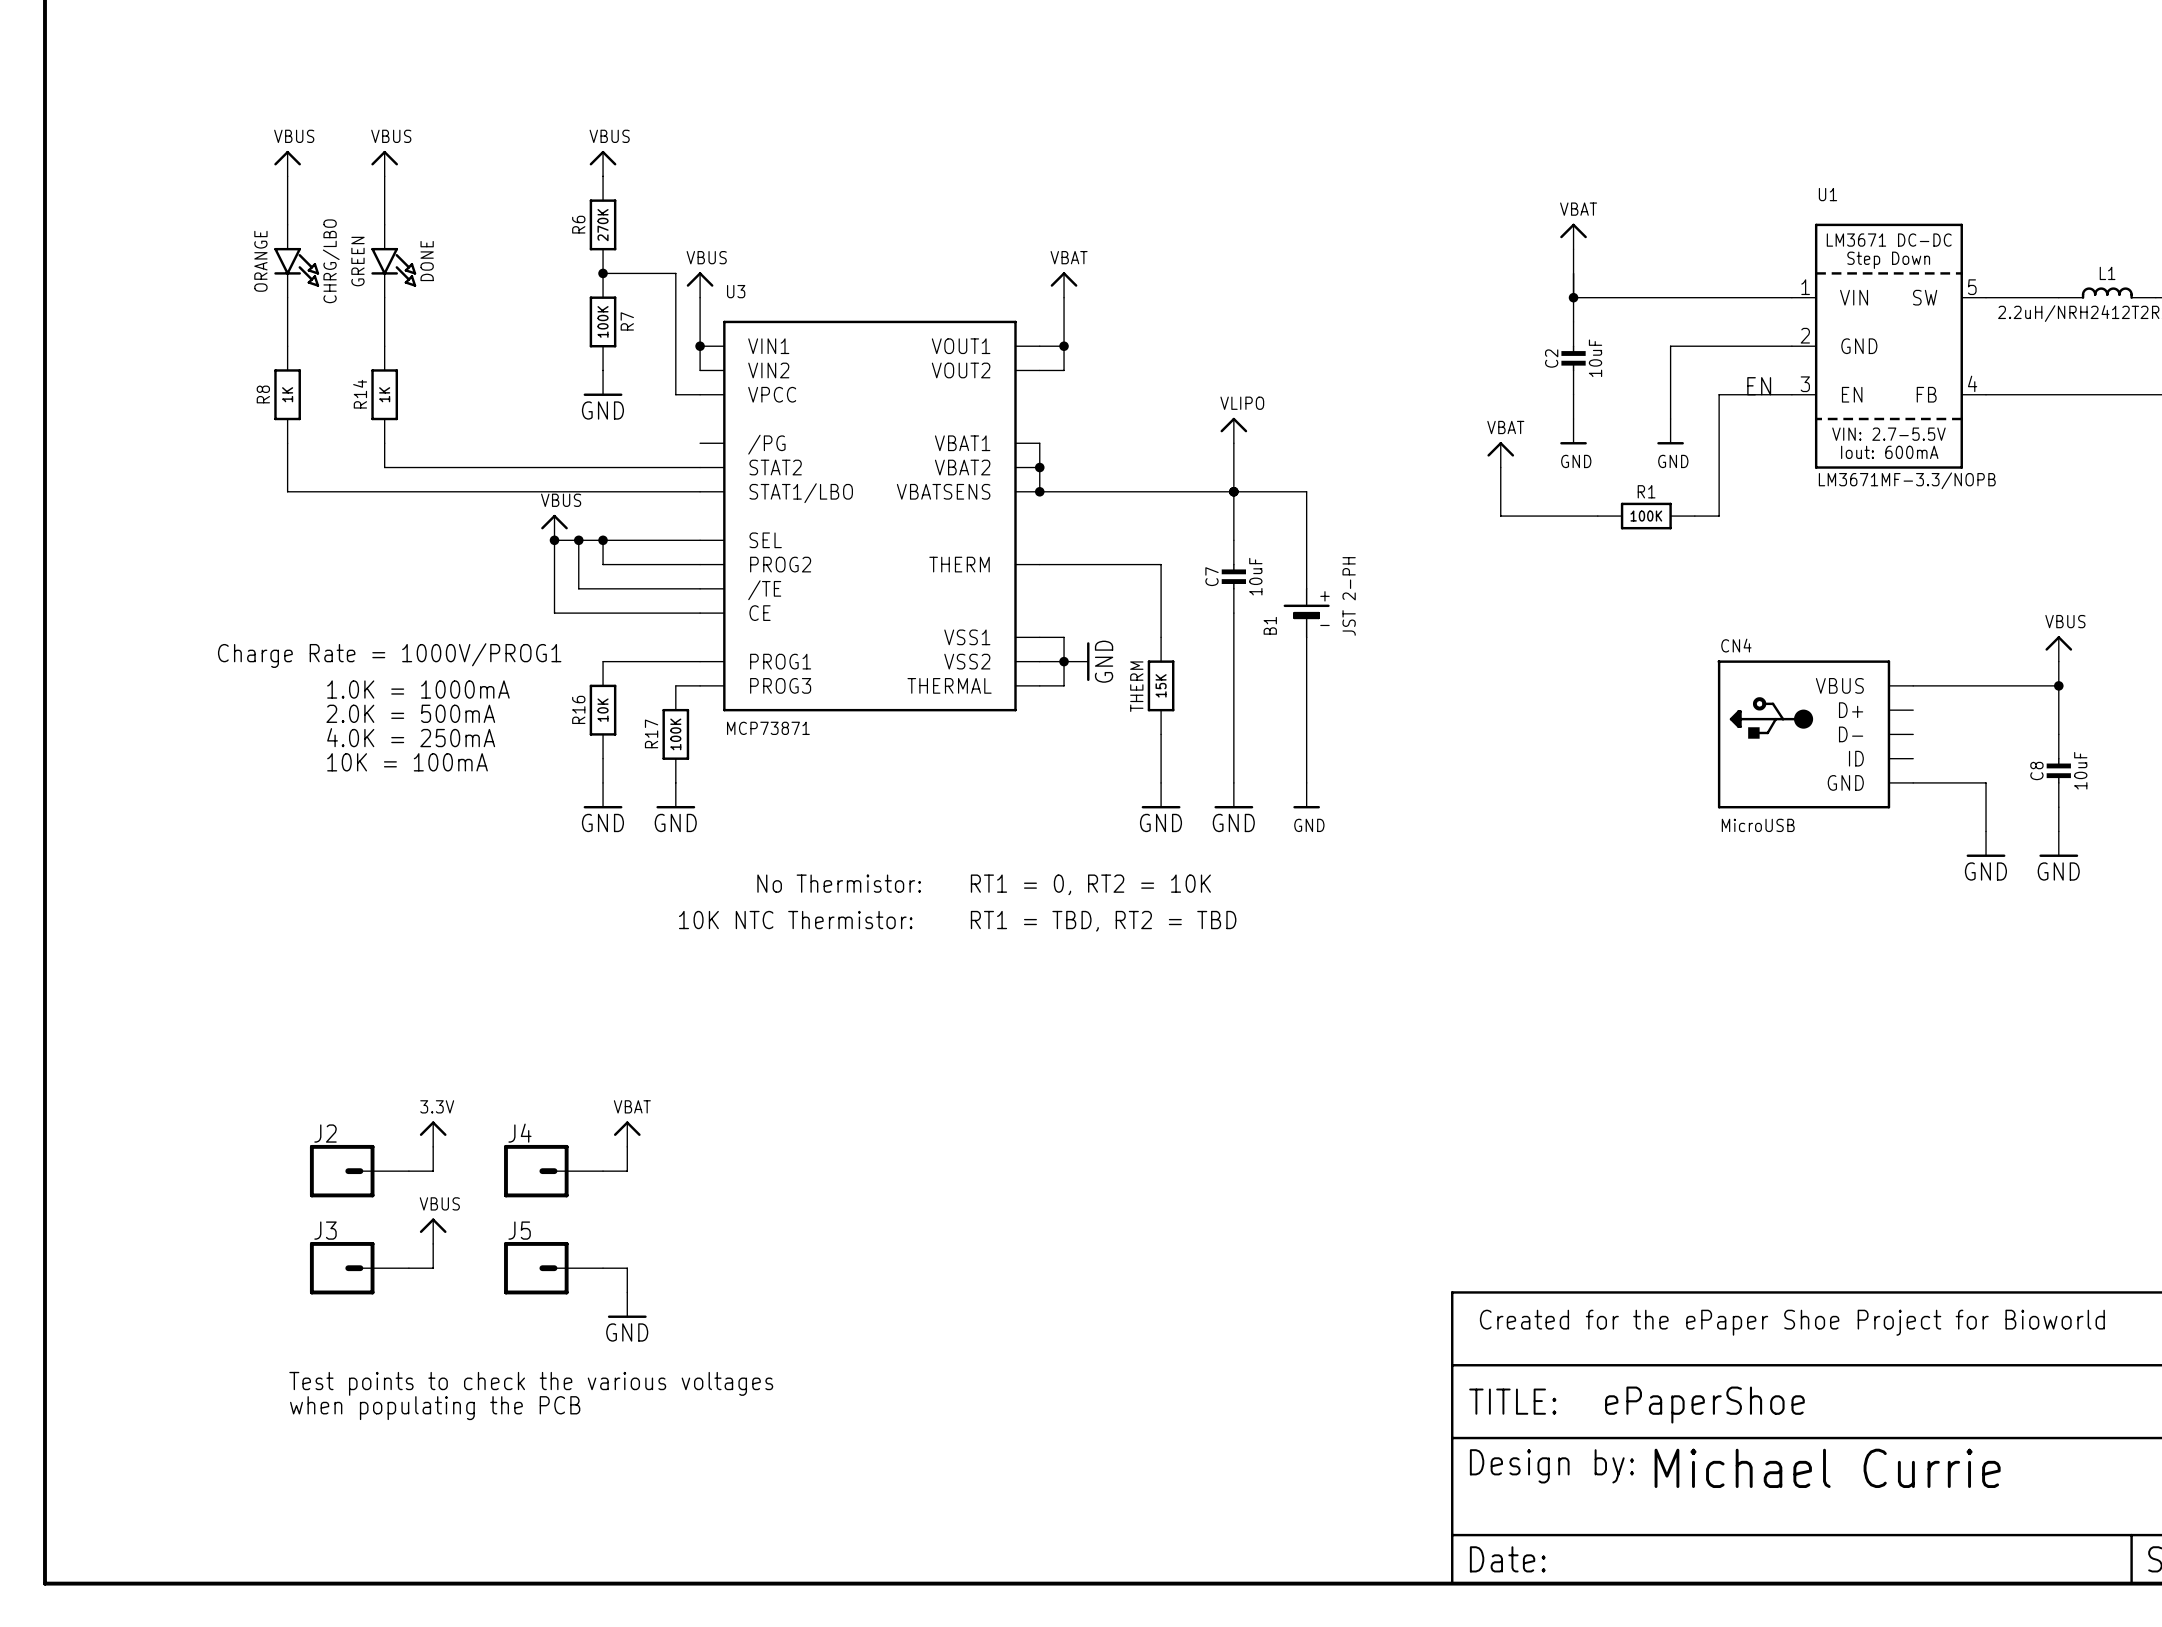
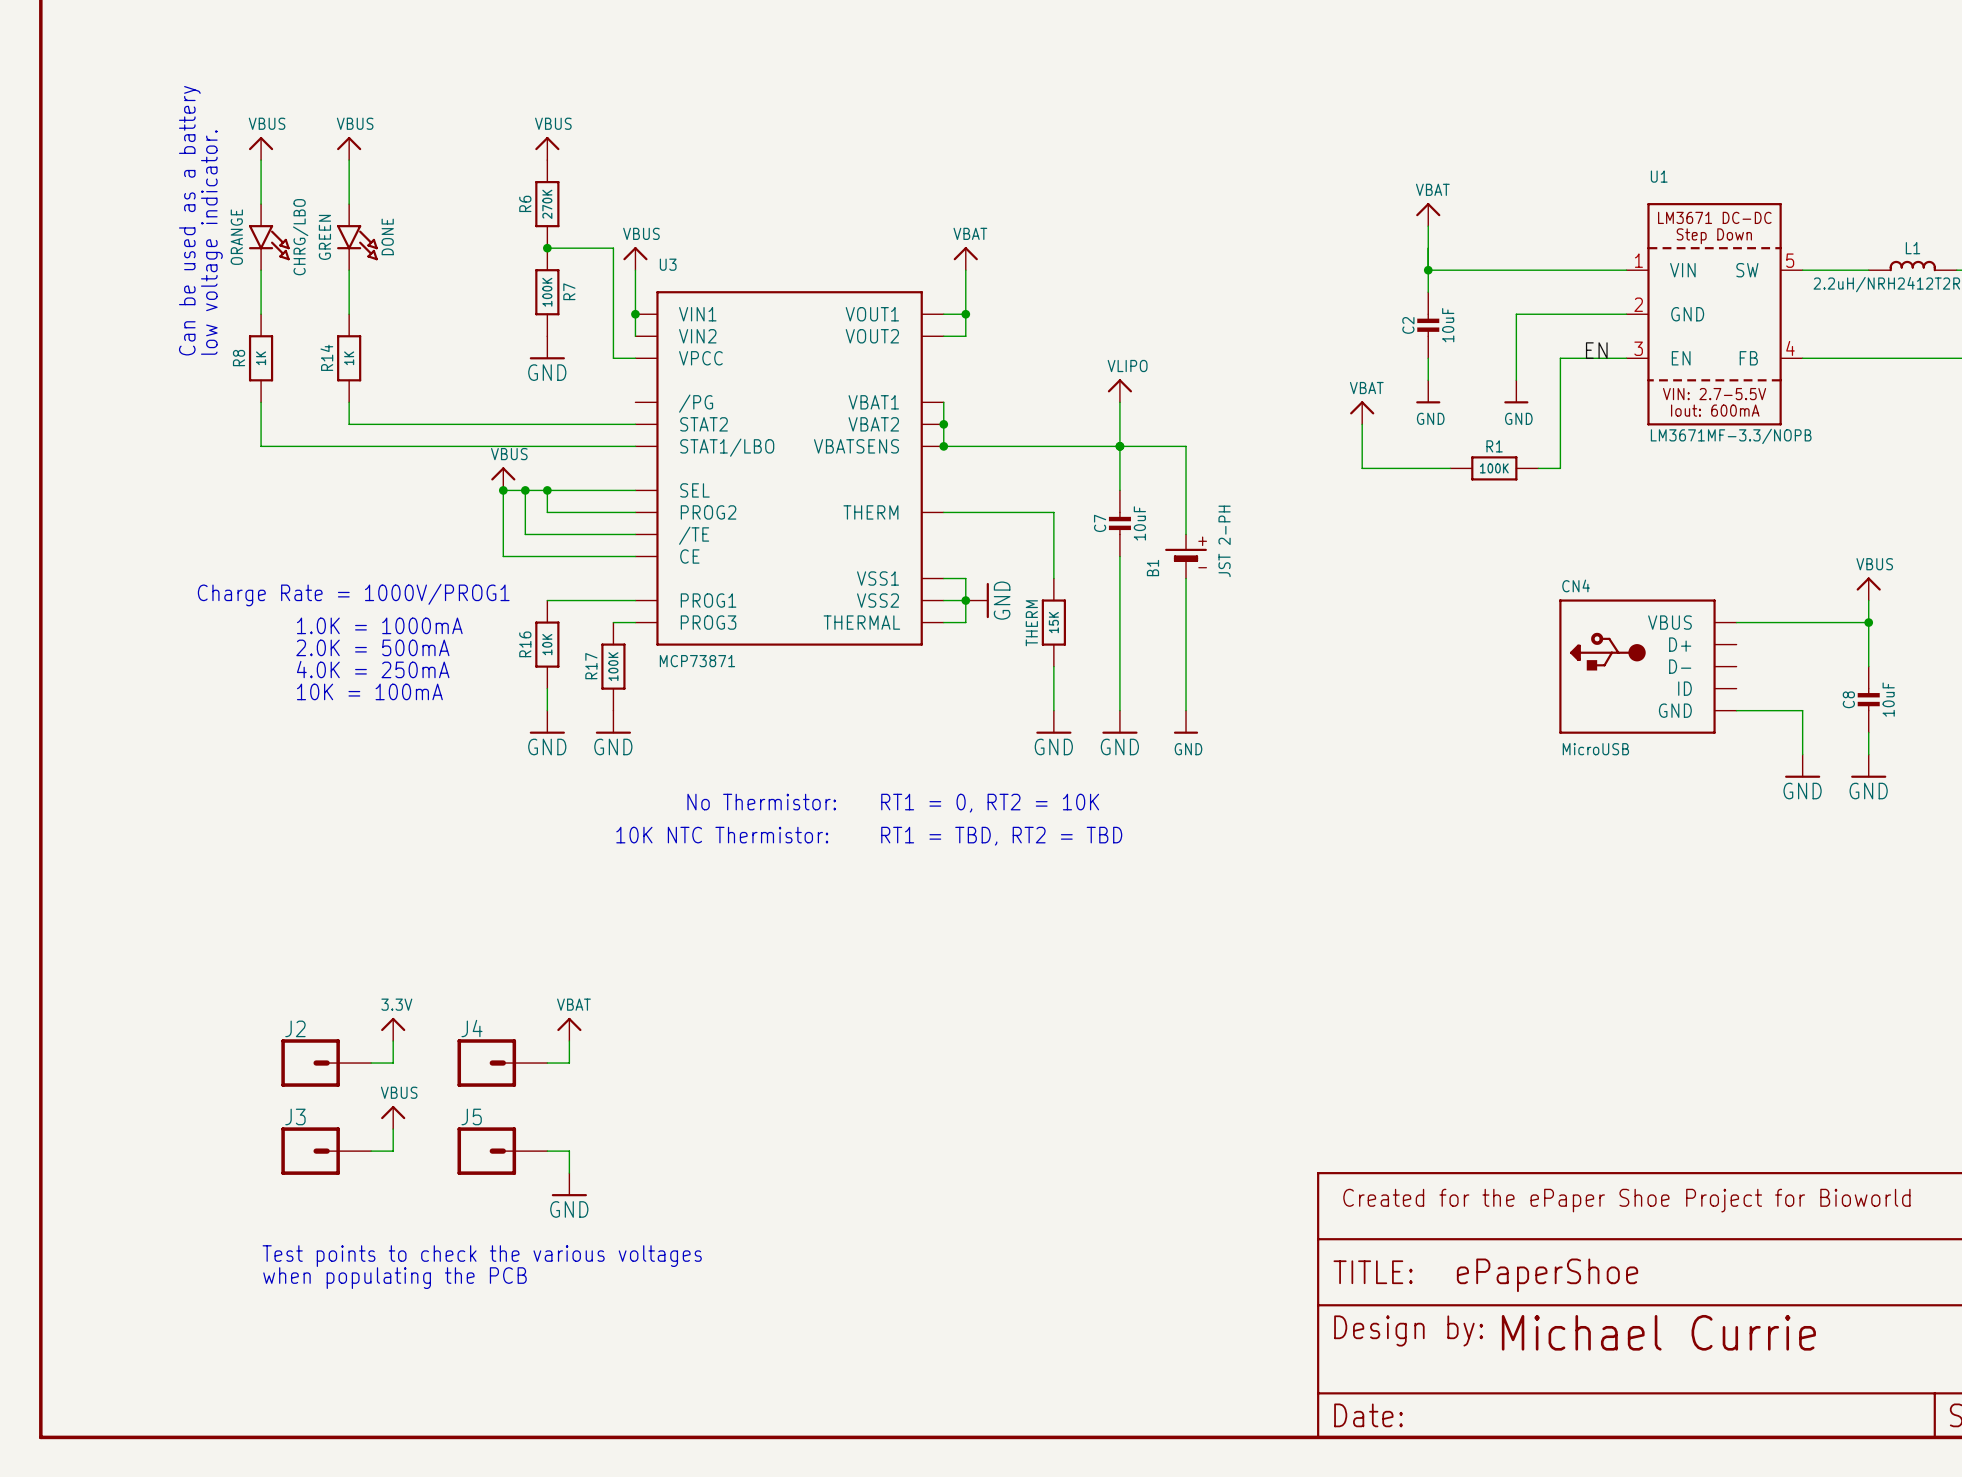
text: none -> Can be used as a battery (189, 220)
text: none -> low voltage indicator. (211, 242)

